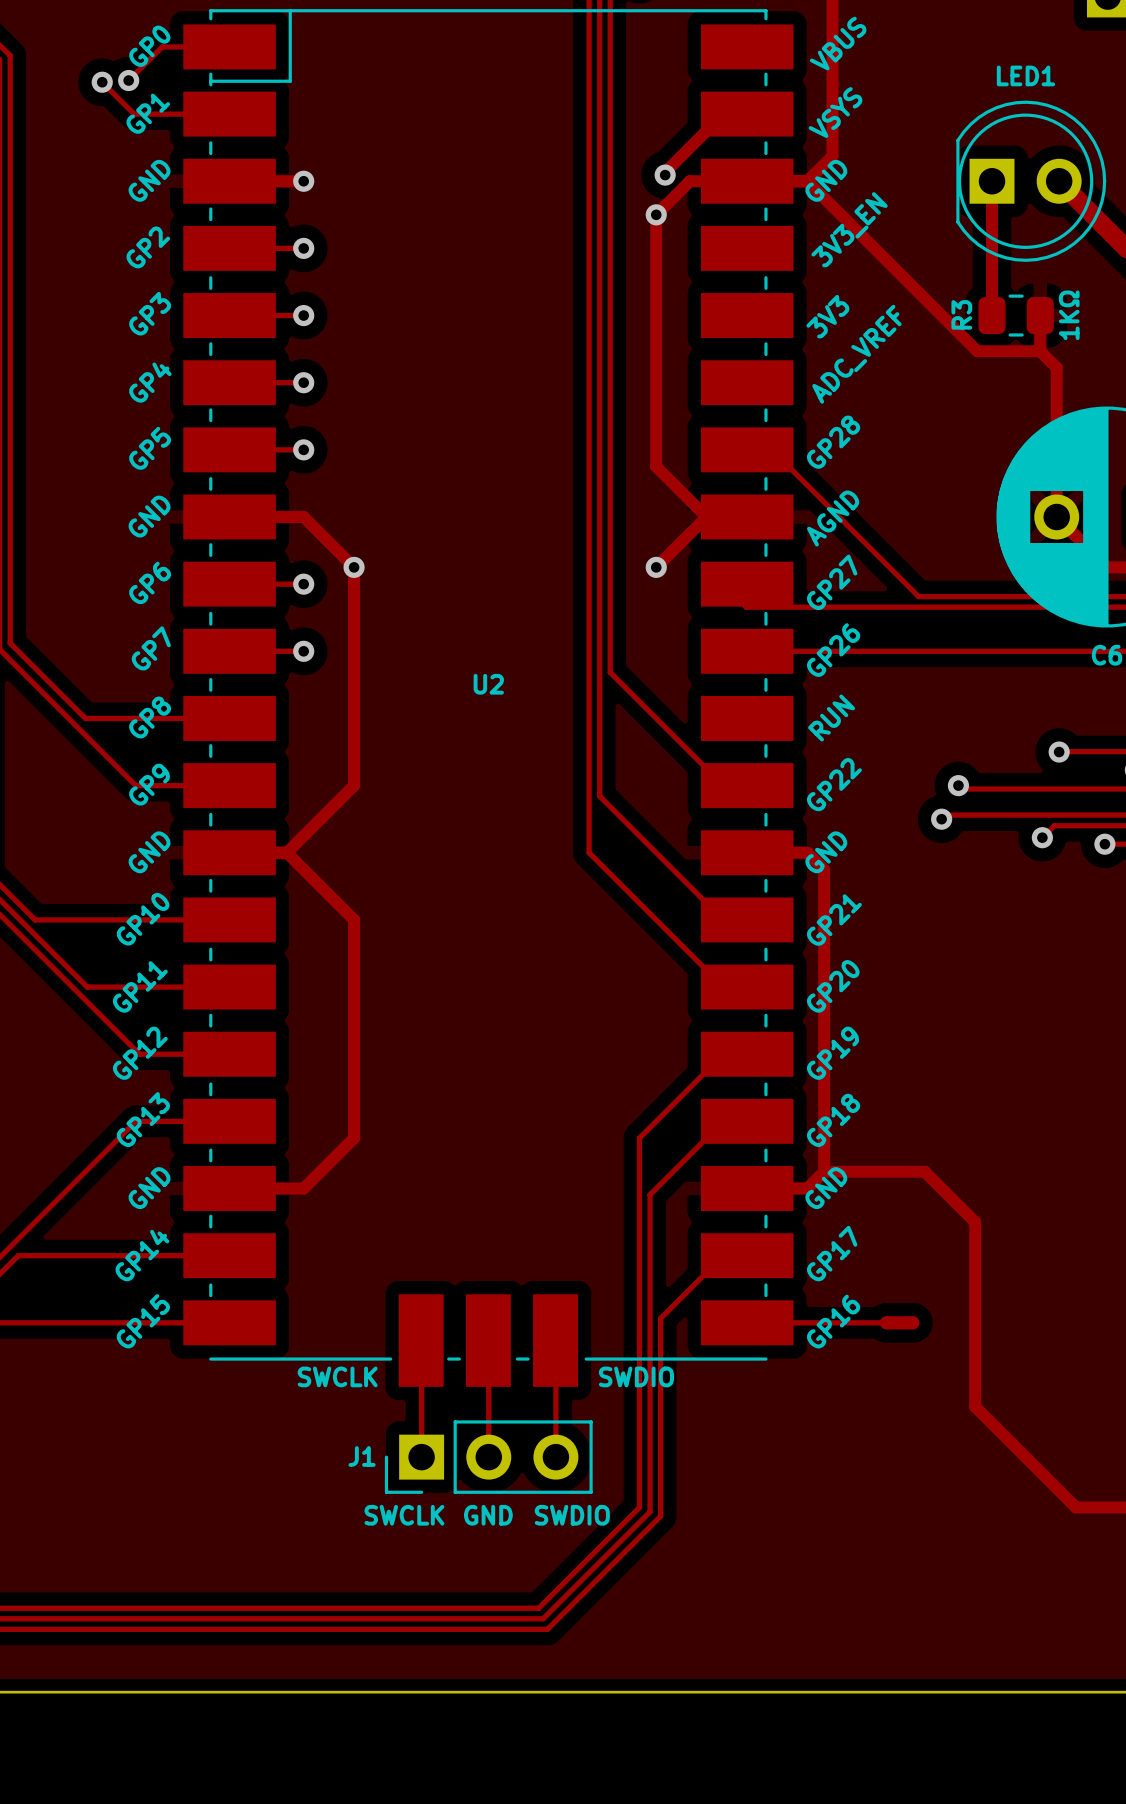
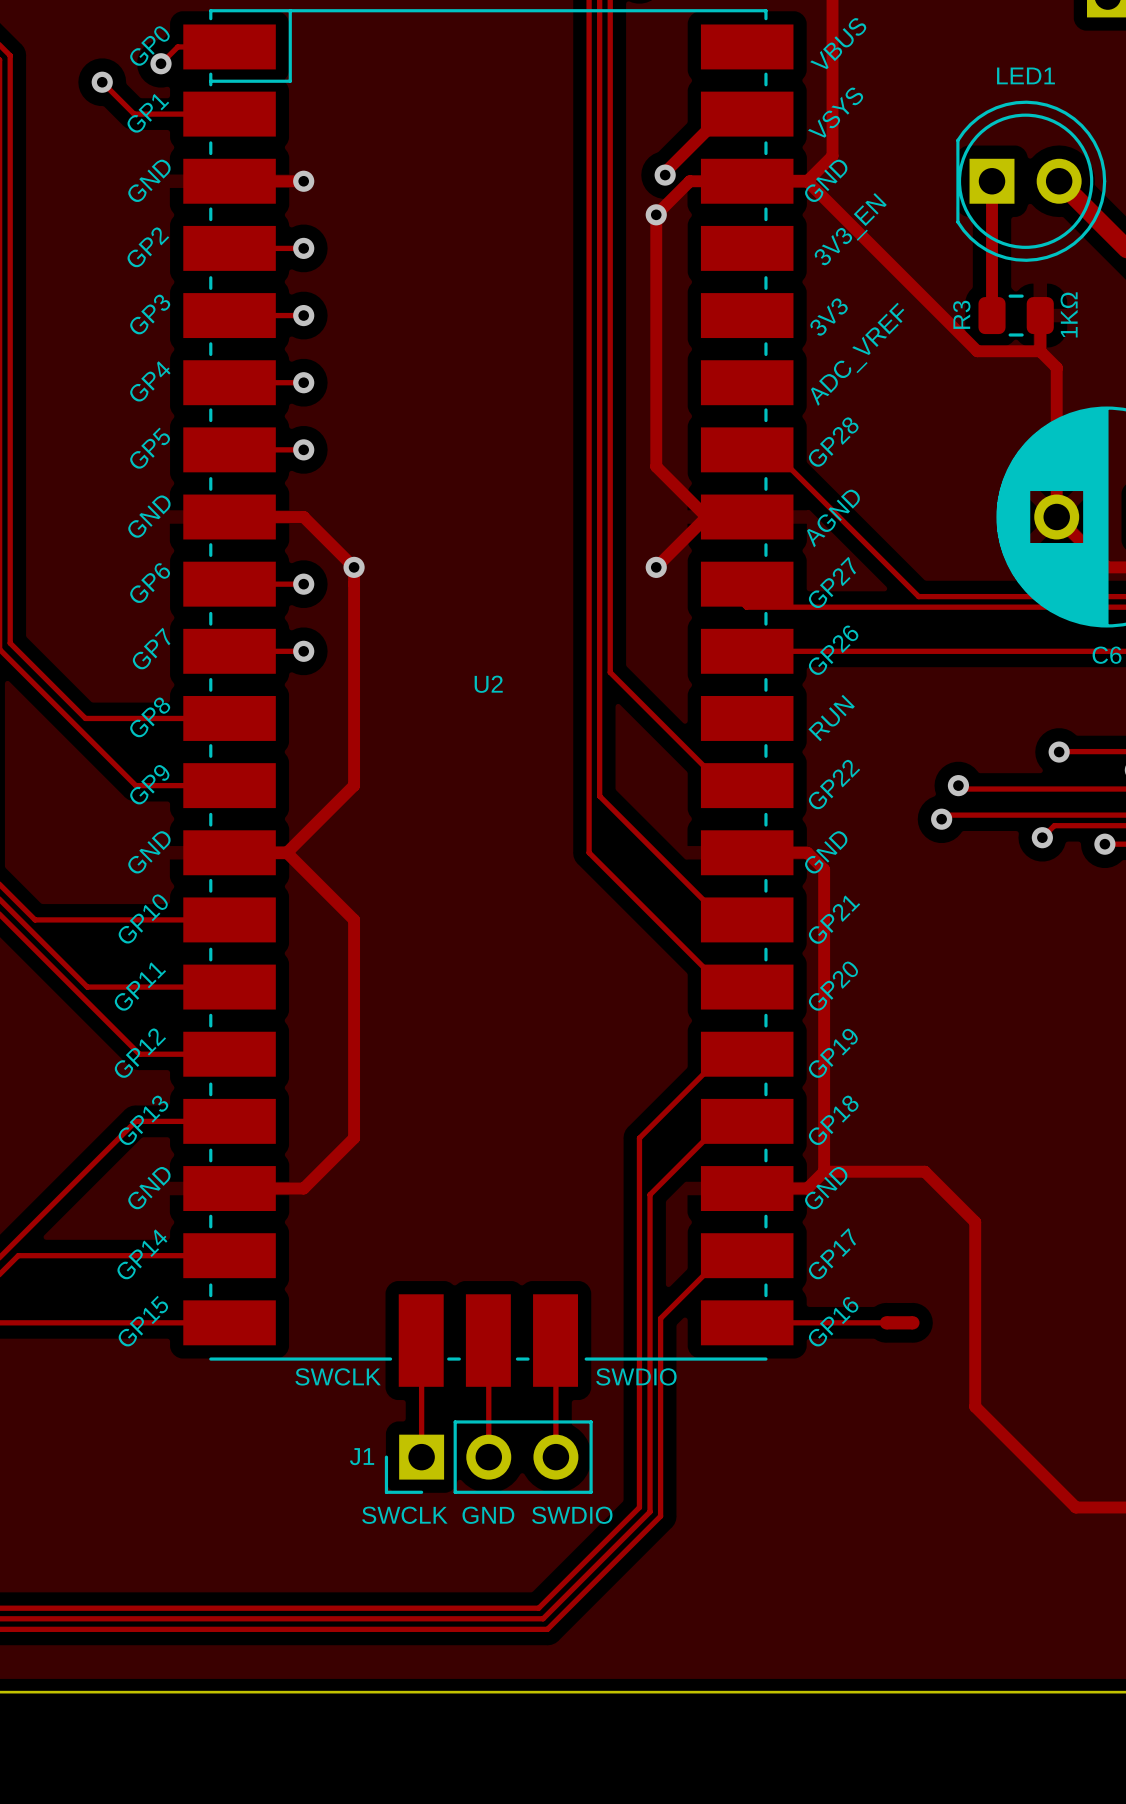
track: (177, 46) (162, 46) (128, 80) -> (177, 46) (161, 63)
via position: (128, 80) -> (161, 63)

